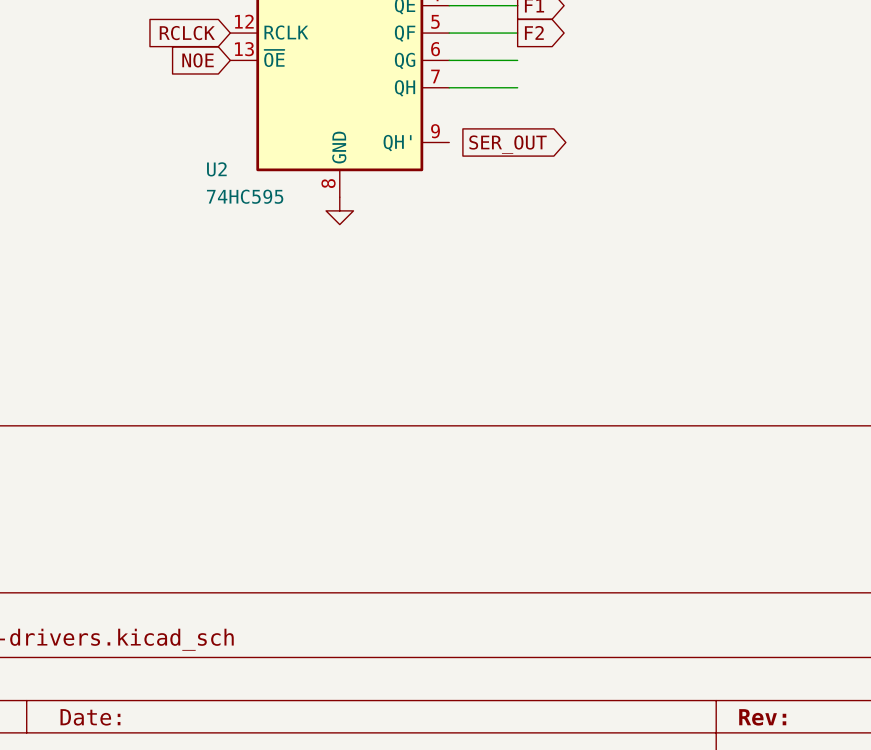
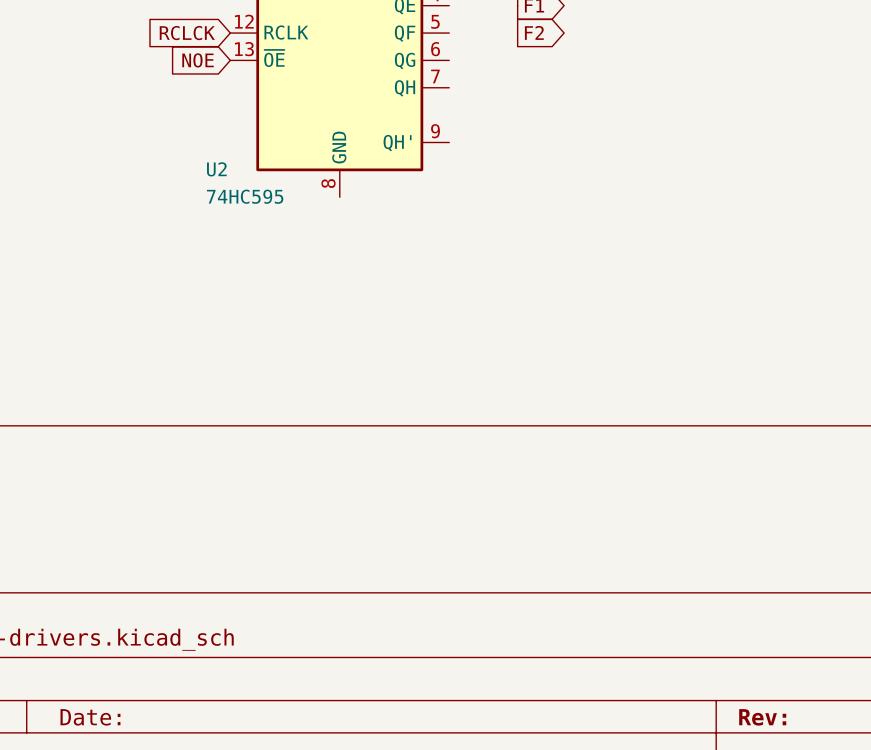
wire: (449, 5) (517, 5) -> none
wire: (449, 33) (517, 33) -> none
wire: (449, 60) (517, 60) -> none
wire: (449, 87) (517, 87) -> none
global label: SER_OUT (508, 144) -> none
power symbol: (339, 210) -> none

